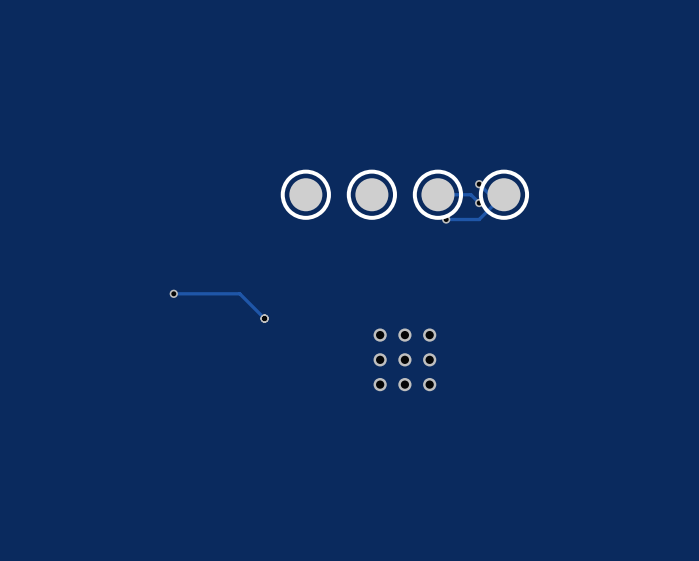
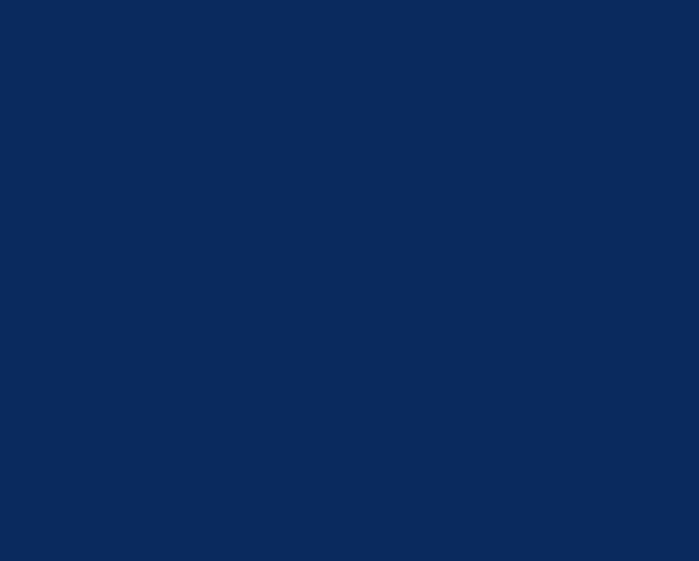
track: (479, 184) (489, 194) (503, 194) (479, 219) (446, 219) -> none
via: (479, 184) -> none
part: (305, 194) -> none
part: (371, 194) -> none
track: (437, 194) (470, 194) (479, 203) -> none
part: (437, 194) -> none
part: (503, 194) -> none
via: (479, 203) -> none
via: (446, 219) -> none
track: (173, 293) (239, 293) (264, 318) -> none
via: (173, 293) -> none
via: (264, 318) -> none
via: (380, 335) -> none
via: (404, 335) -> none
via: (429, 335) -> none
via: (380, 359) -> none
via: (404, 359) -> none
via: (429, 359) -> none
via: (380, 384) -> none
via: (404, 384) -> none
via: (429, 384) -> none

